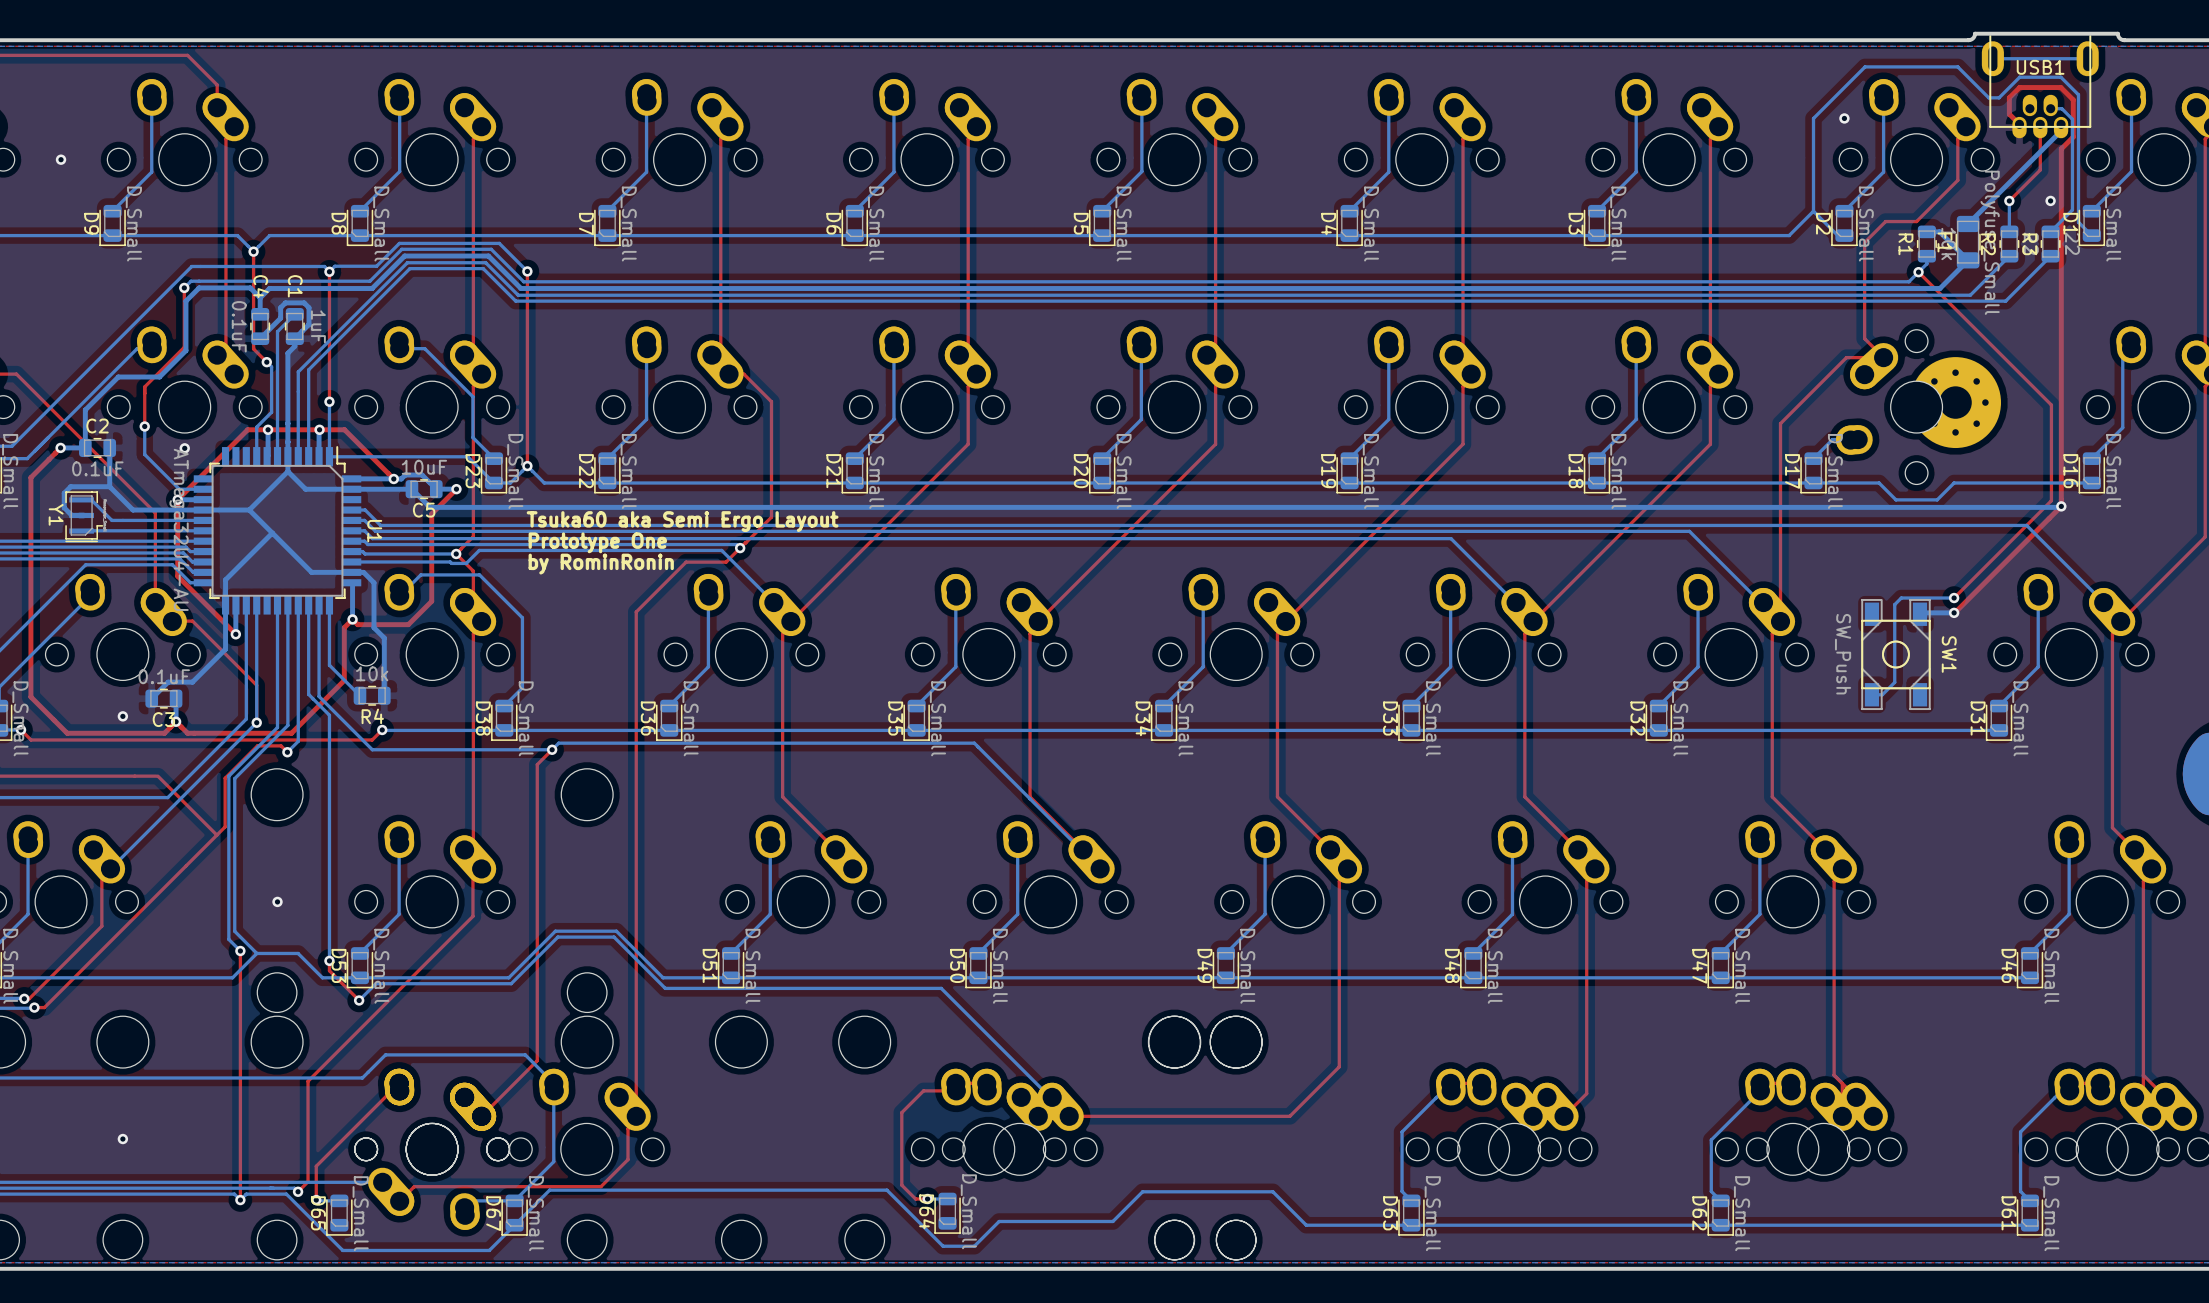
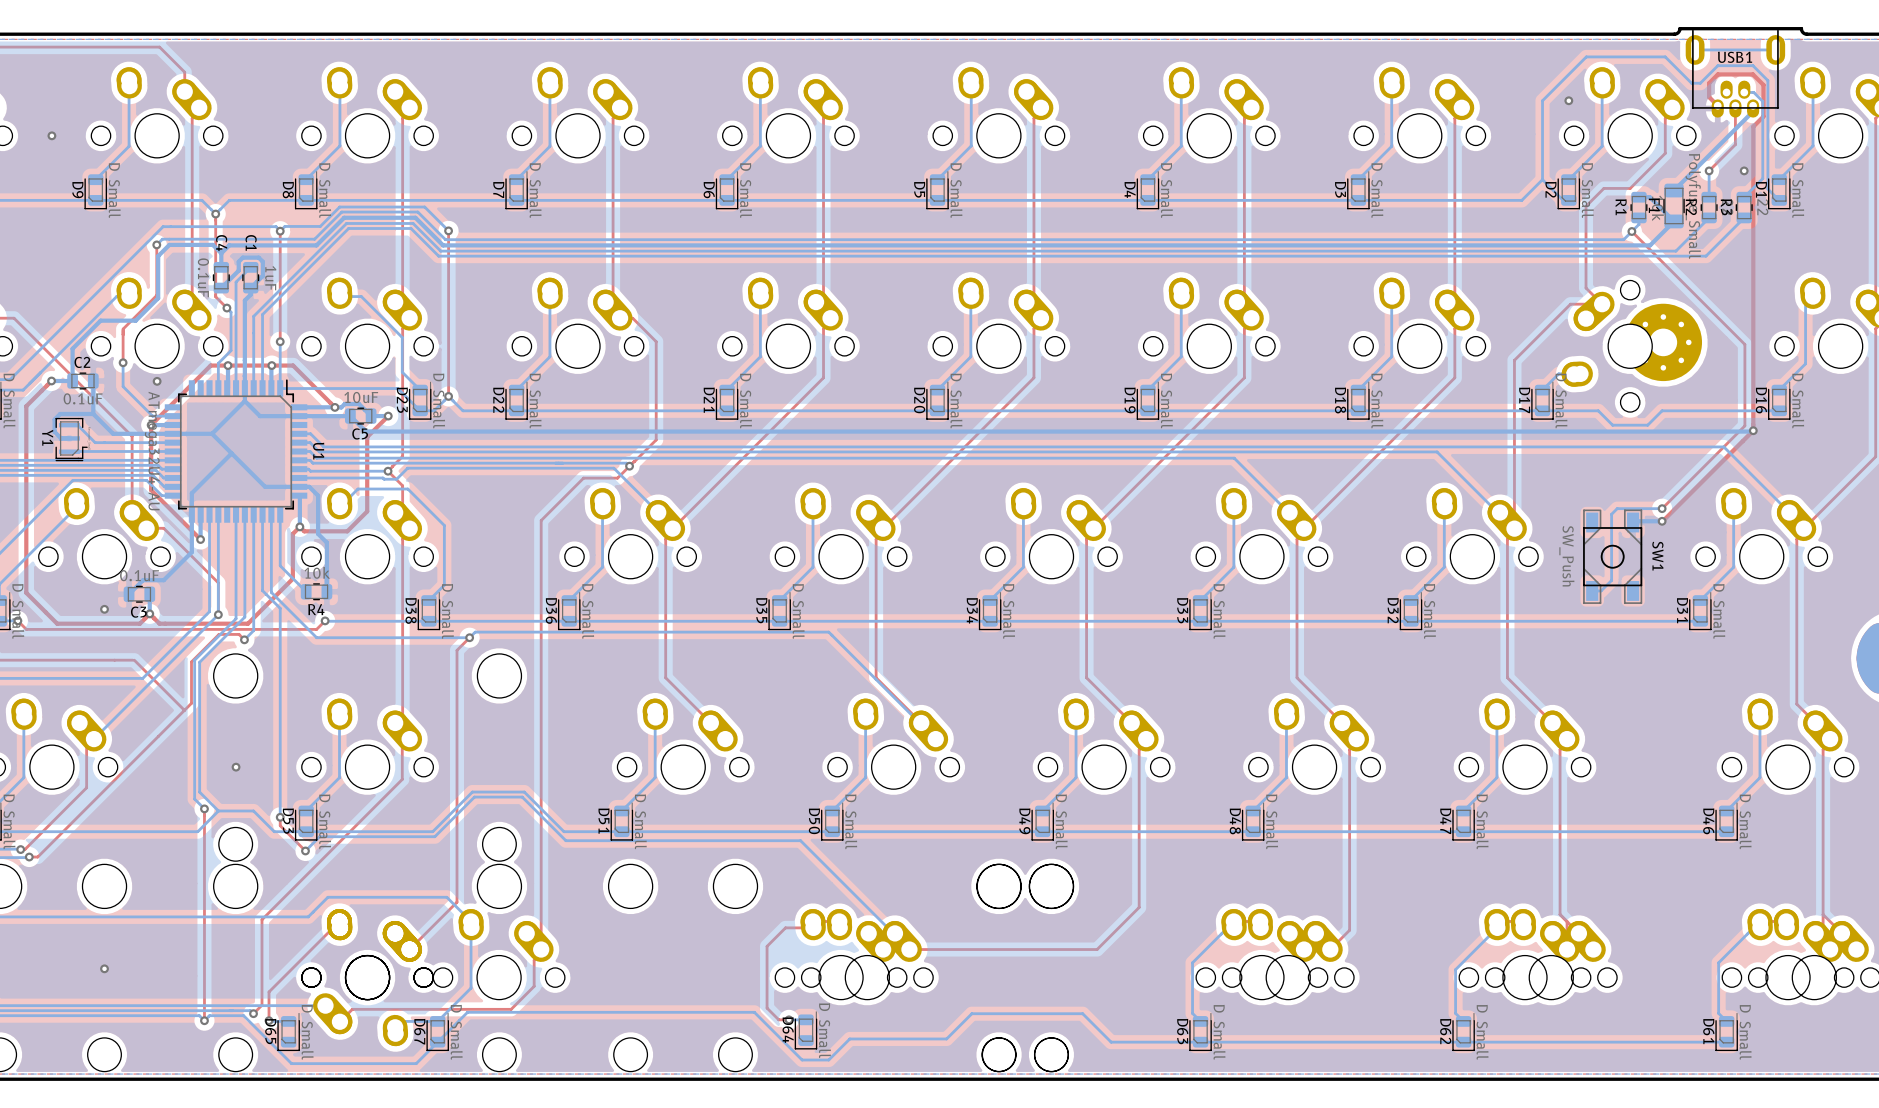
text: Tsuka60 aka Semi Ergo Layout (682, 521) -> none
text: Prototype One (597, 542) -> none
text: by RominRonin (601, 564) -> none

